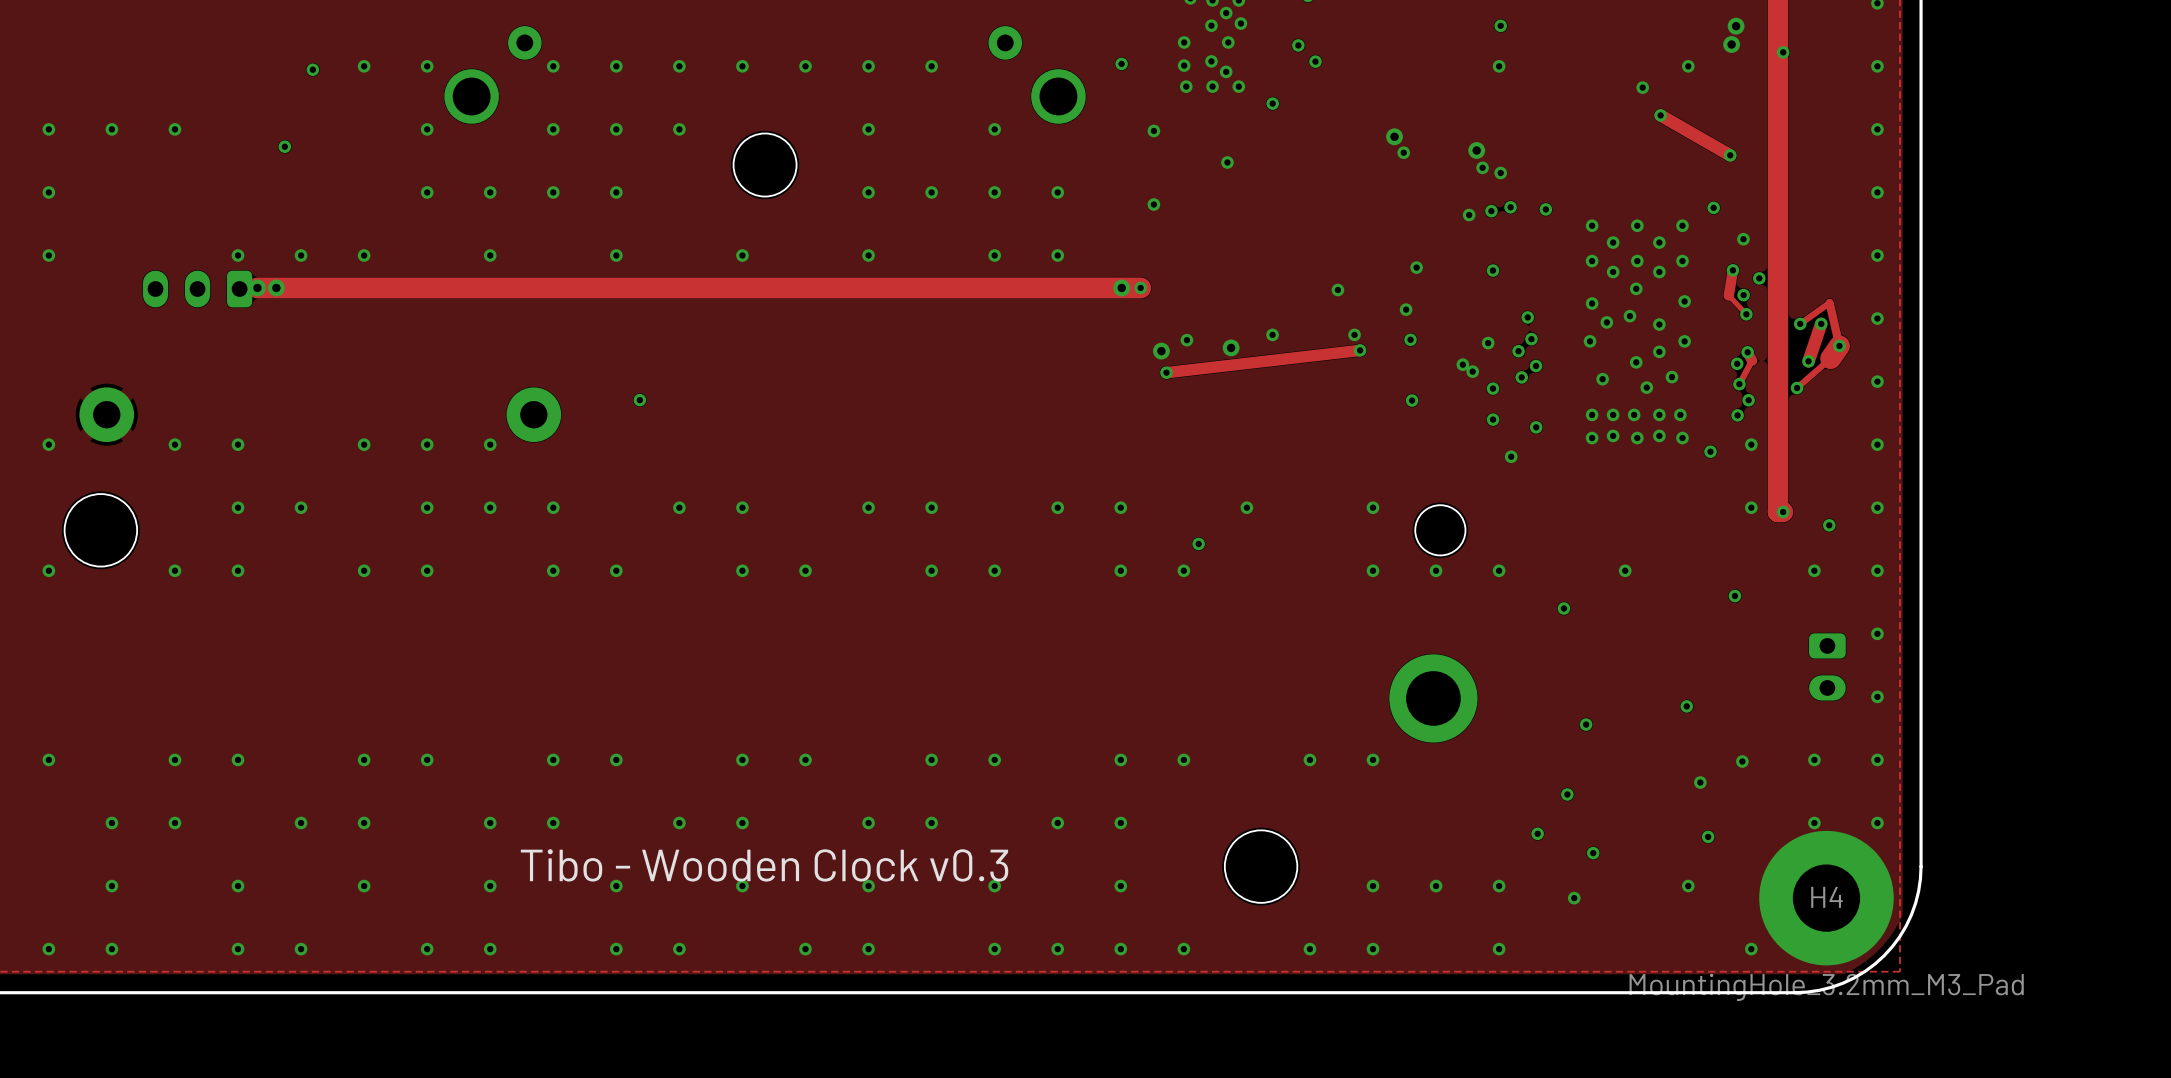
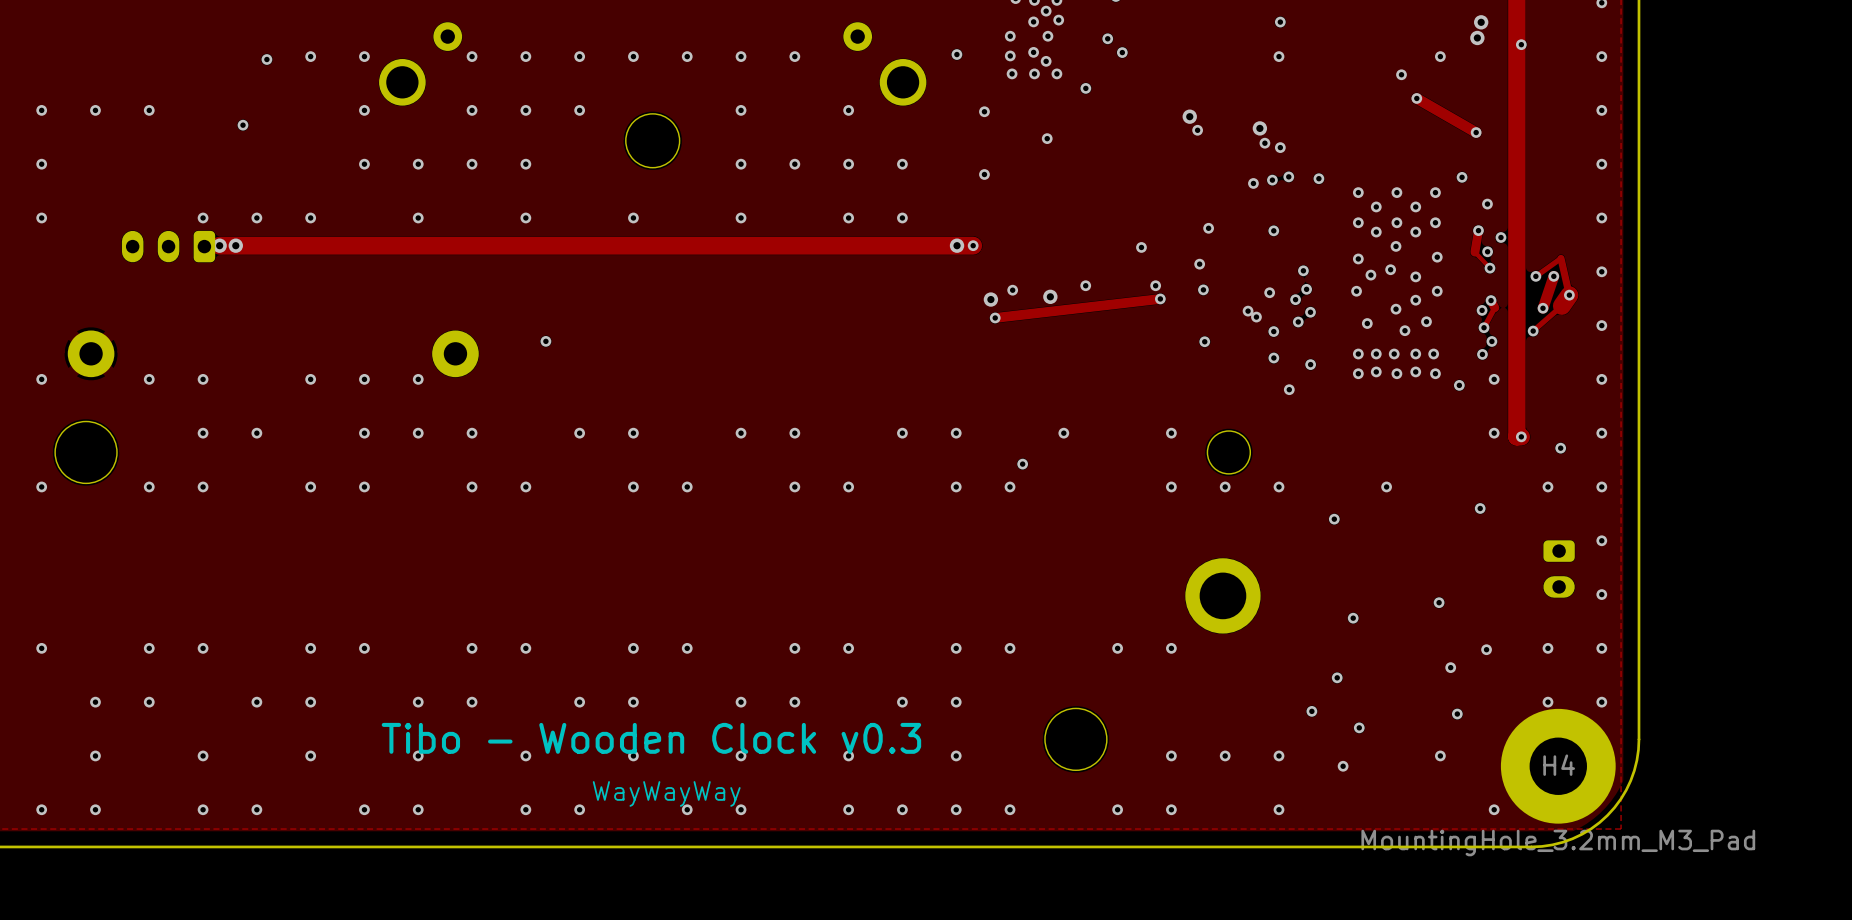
text: none -> WayWayWay (666, 793)

